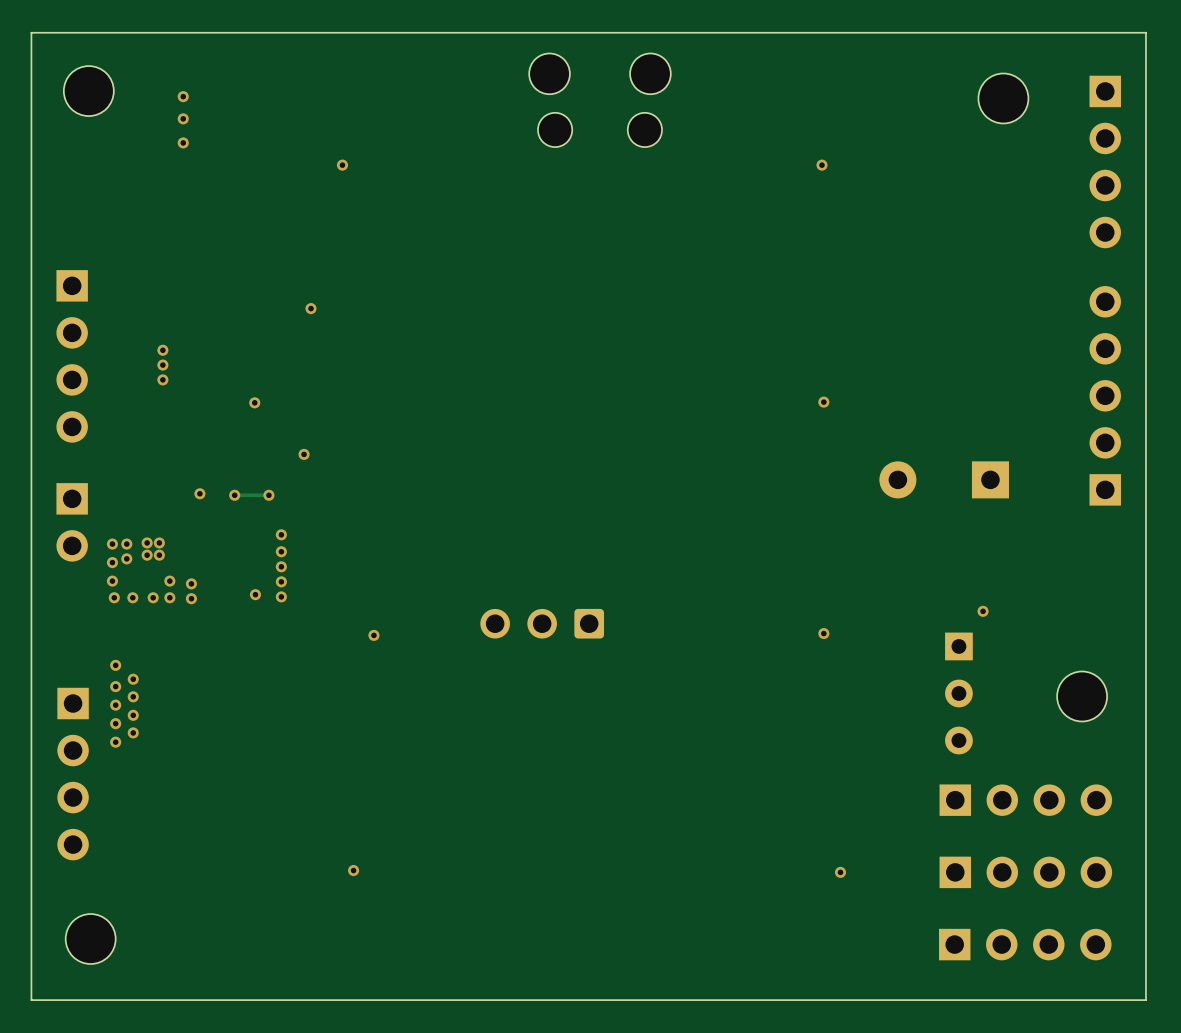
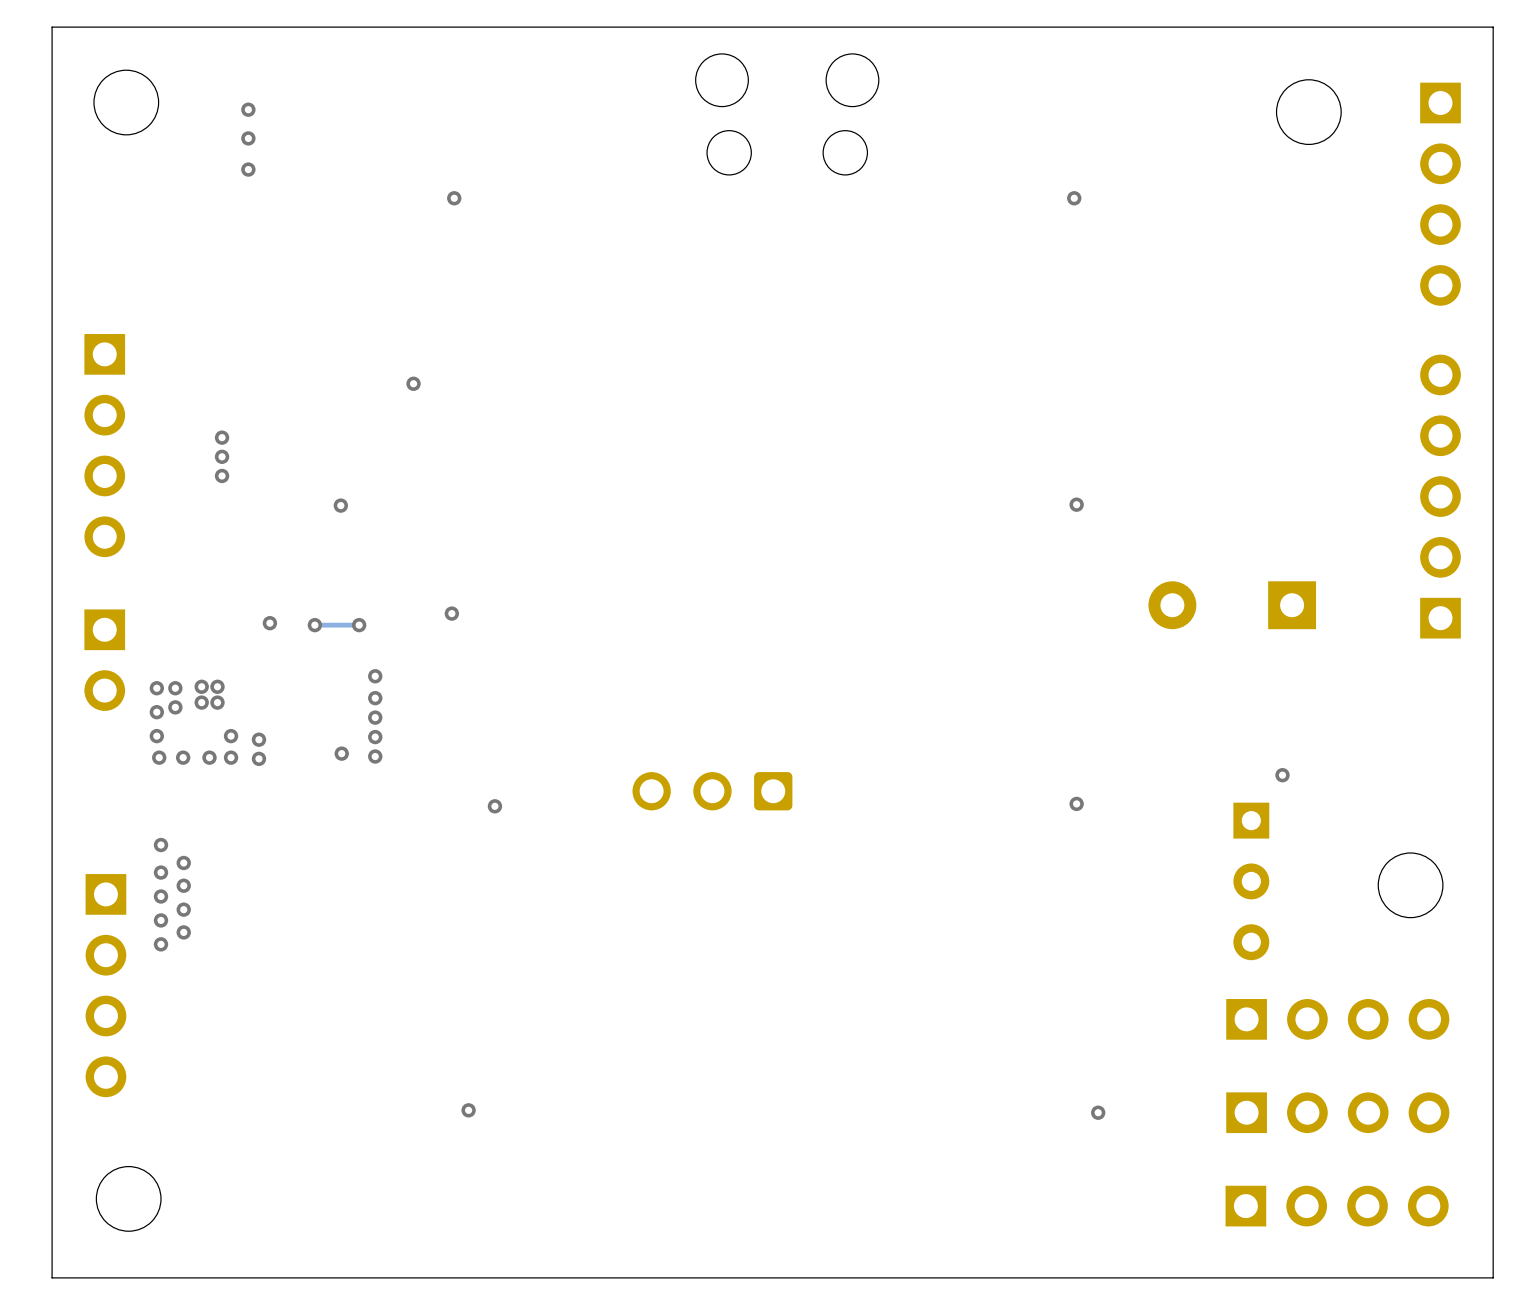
via position: (304, 454) -> (451, 613)

